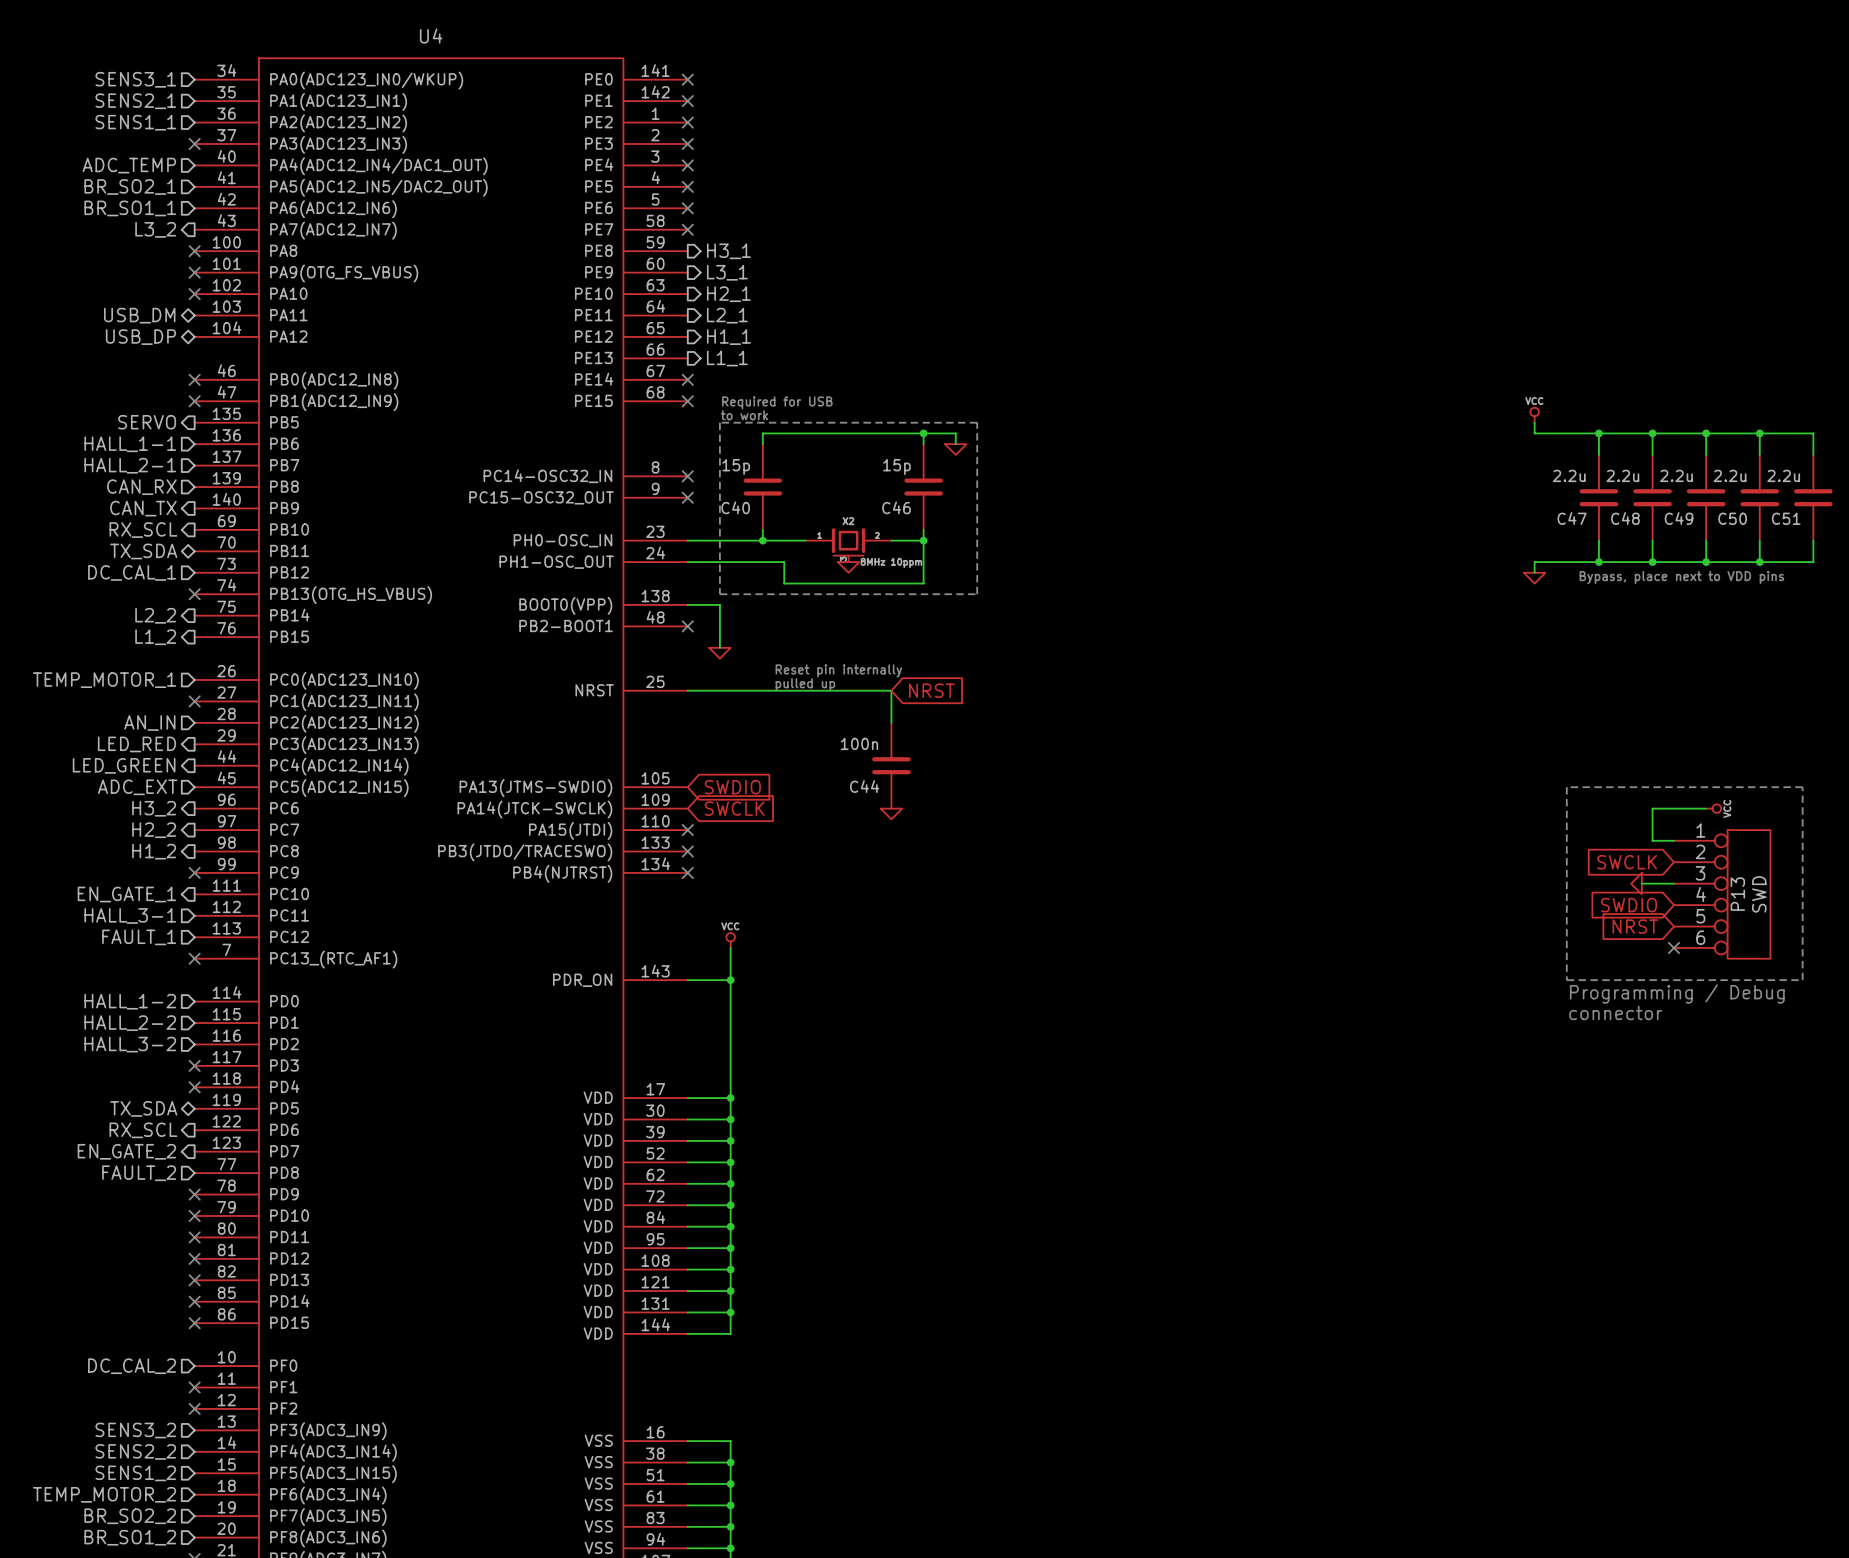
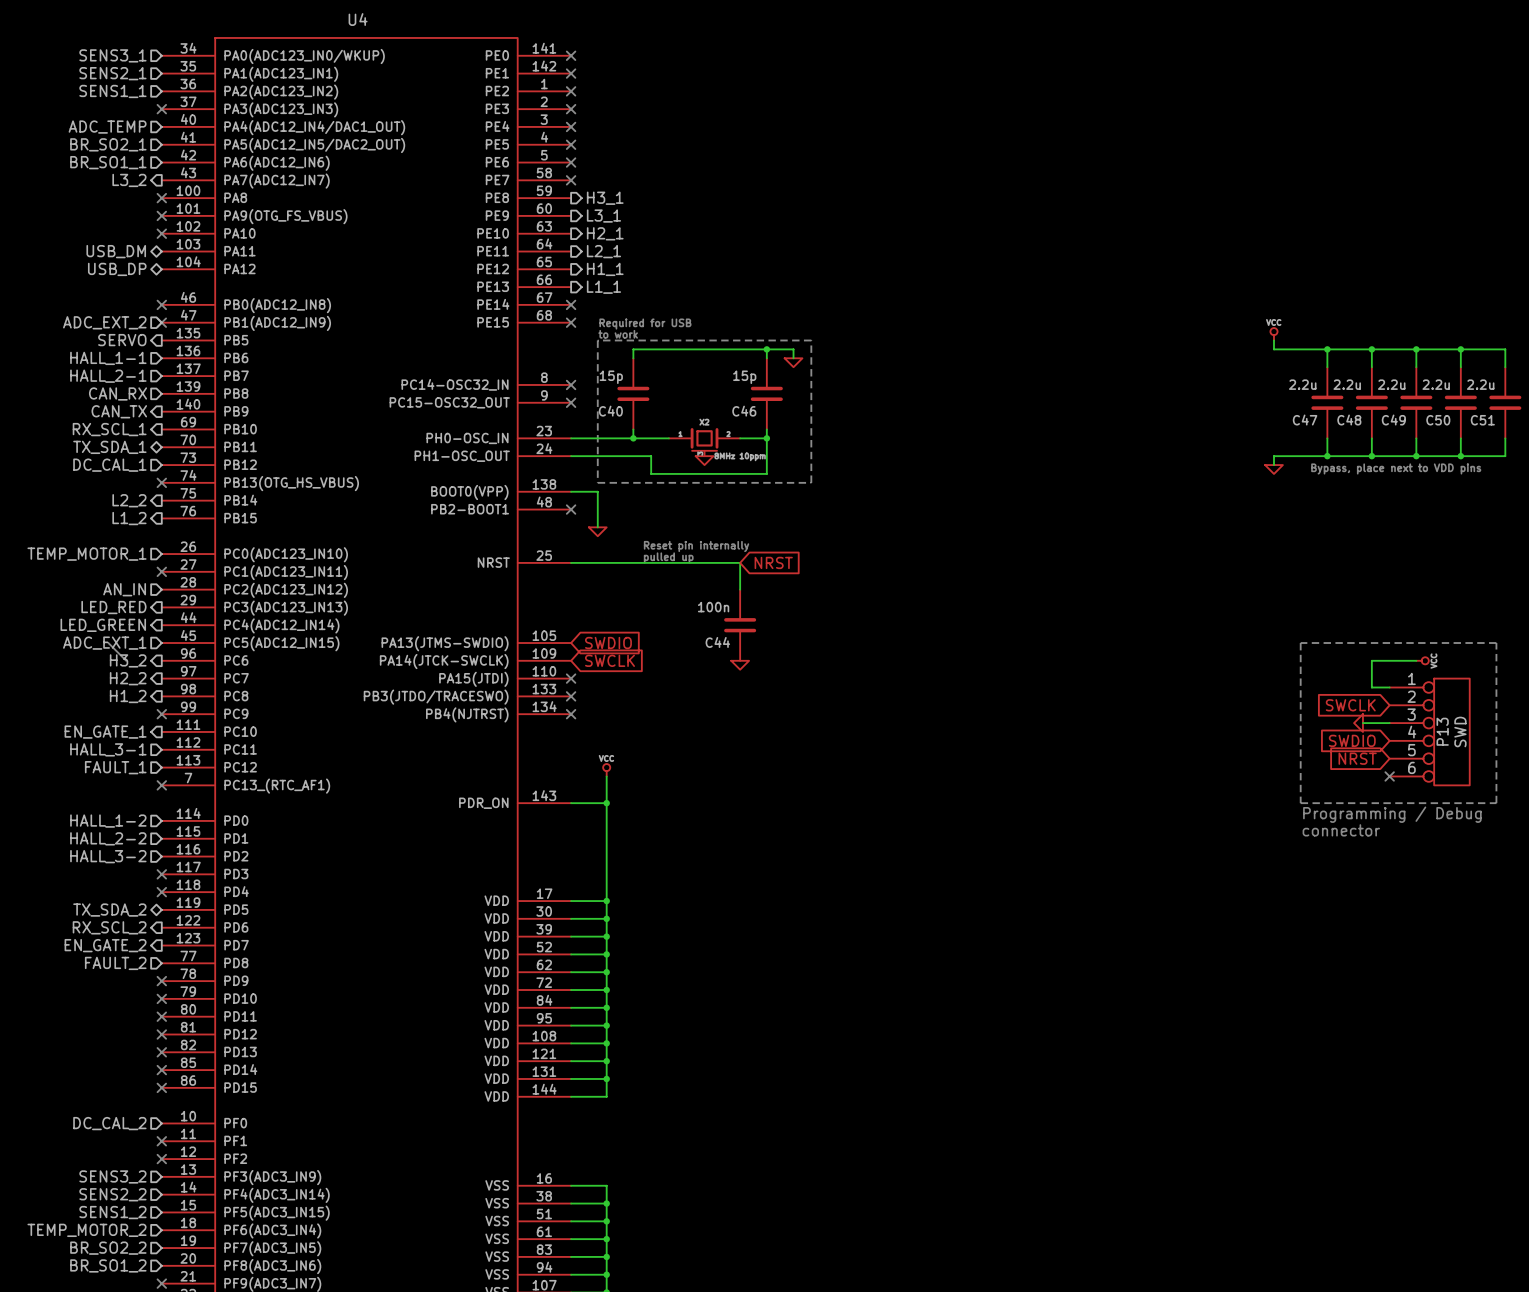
hierarchical label: none -> ADC_EXT_2 (104, 322)
hierarchical label: RX_SCL (143, 530) -> RX_SCL_1 (109, 429)
hierarchical label: TX_SDA (143, 551) -> TX_SDA_1 (109, 447)
bus: none -> (108, 643) (126, 660)
hierarchical label: ADC_EXT (137, 787) -> ADC_EXT_1 (104, 643)
hierarchical label: TX_SDA (143, 1108) -> TX_SDA_2 (109, 910)
hierarchical label: RX_SCL (143, 1130) -> RX_SCL_2 (109, 927)

